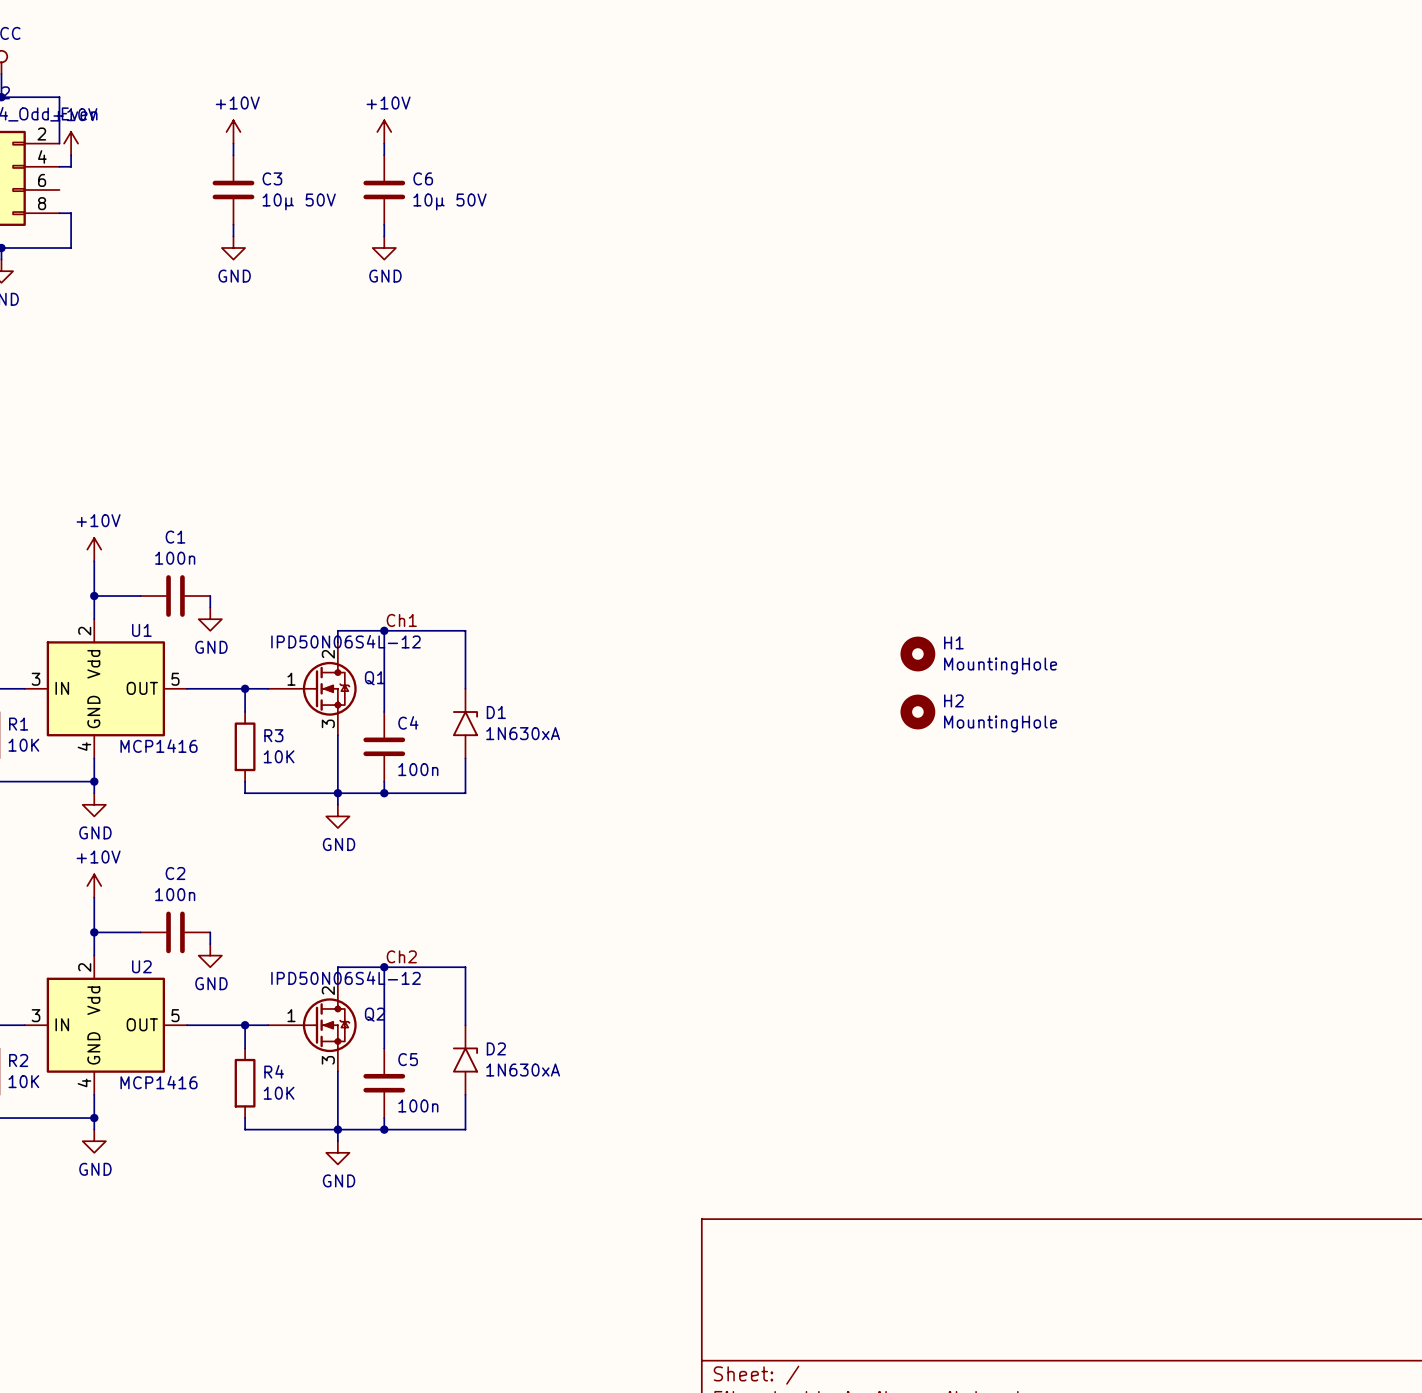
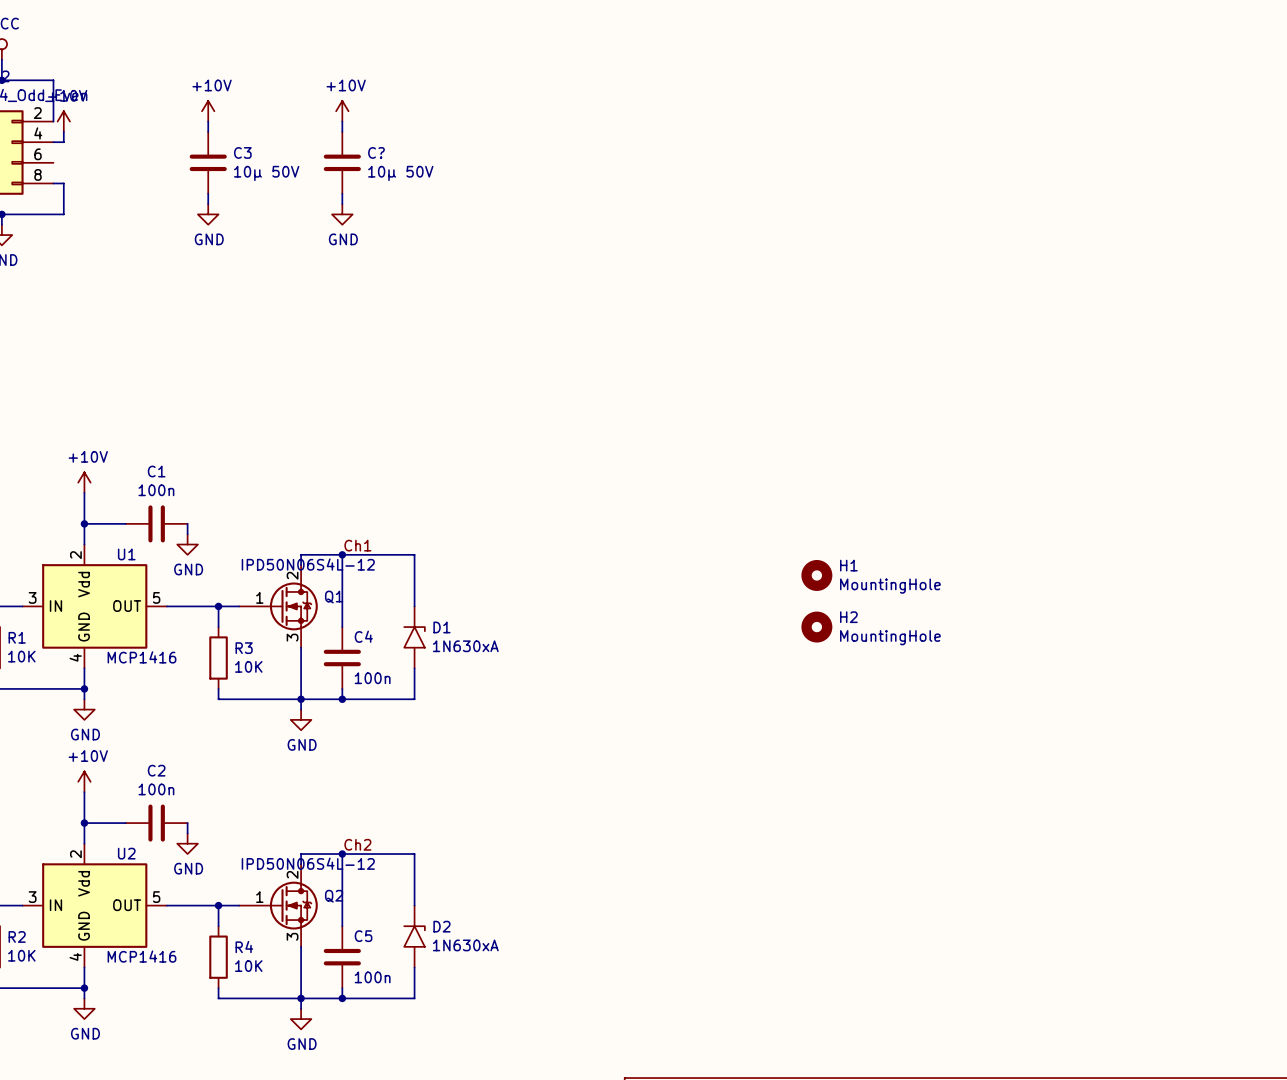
C6 name: C6 (423, 178) -> C? (376, 152)

